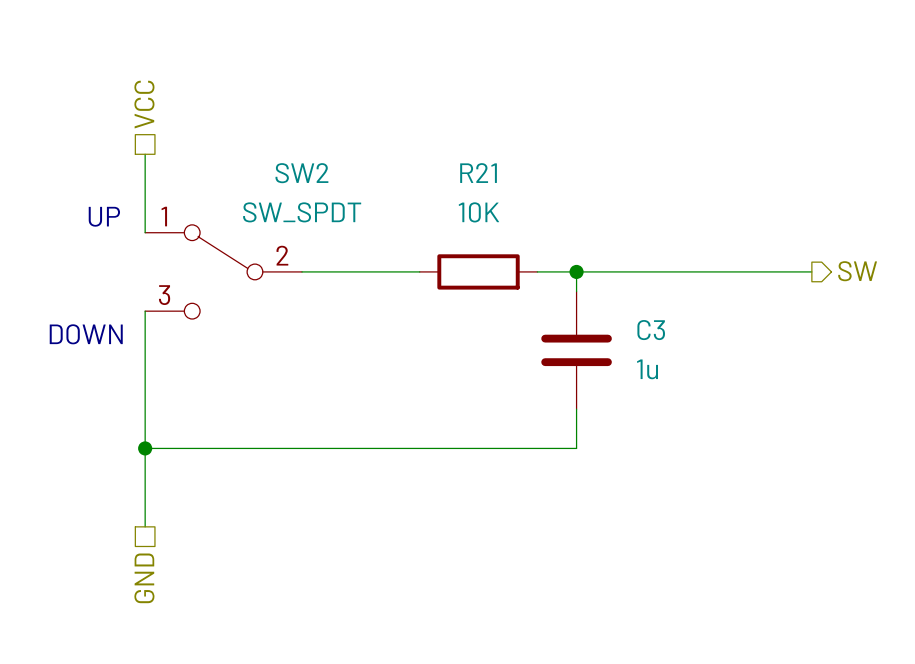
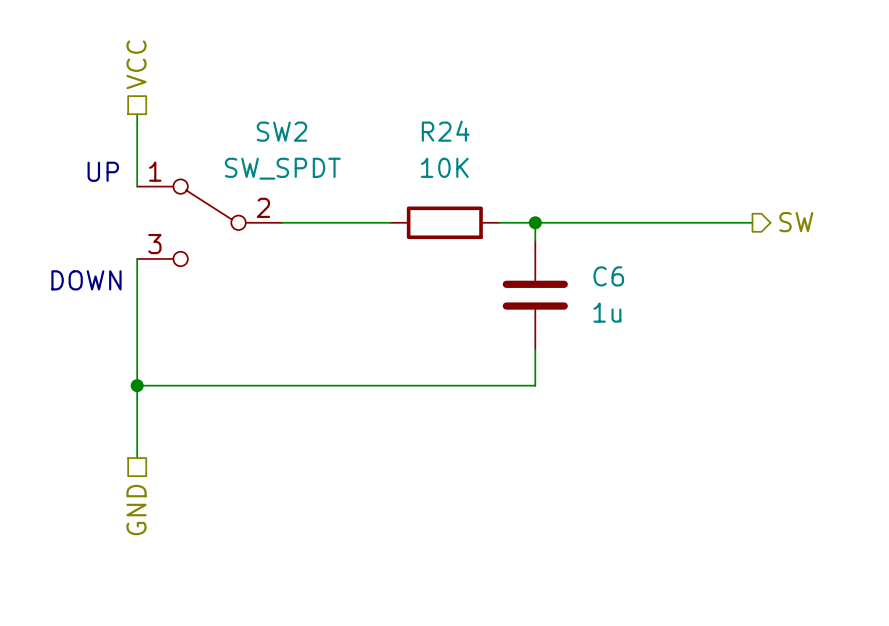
R21 name: R21 (478, 173) -> R24 (445, 131)
C3 name: C3 (651, 330) -> C6 (608, 276)

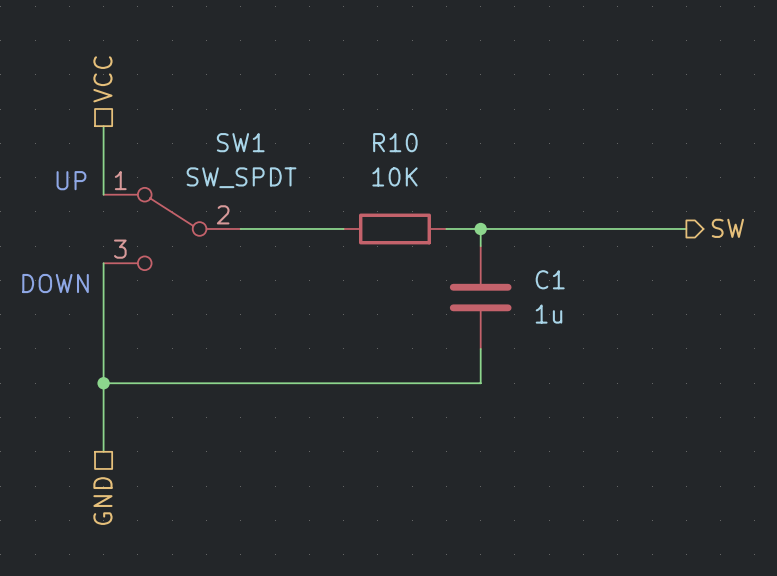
SW2 name: SW2 (281, 131) -> SW1 (240, 142)
R24 name: R24 (445, 131) -> R10 (395, 142)
C6 name: C6 (608, 276) -> C1 (550, 279)

